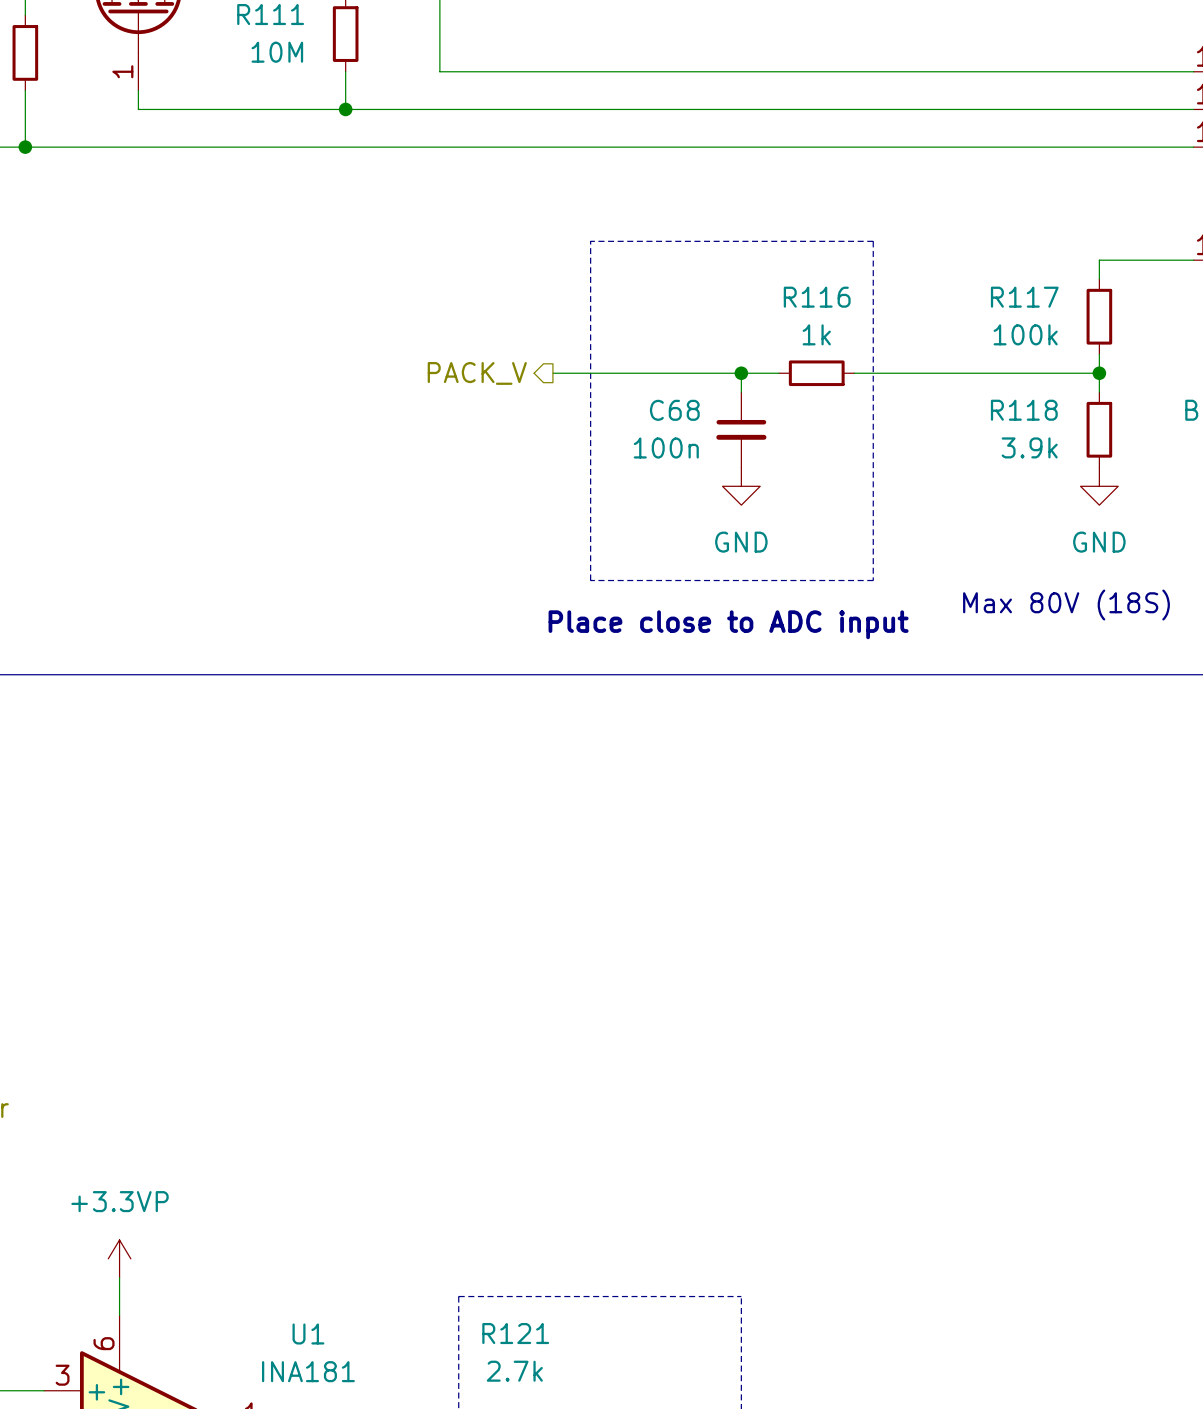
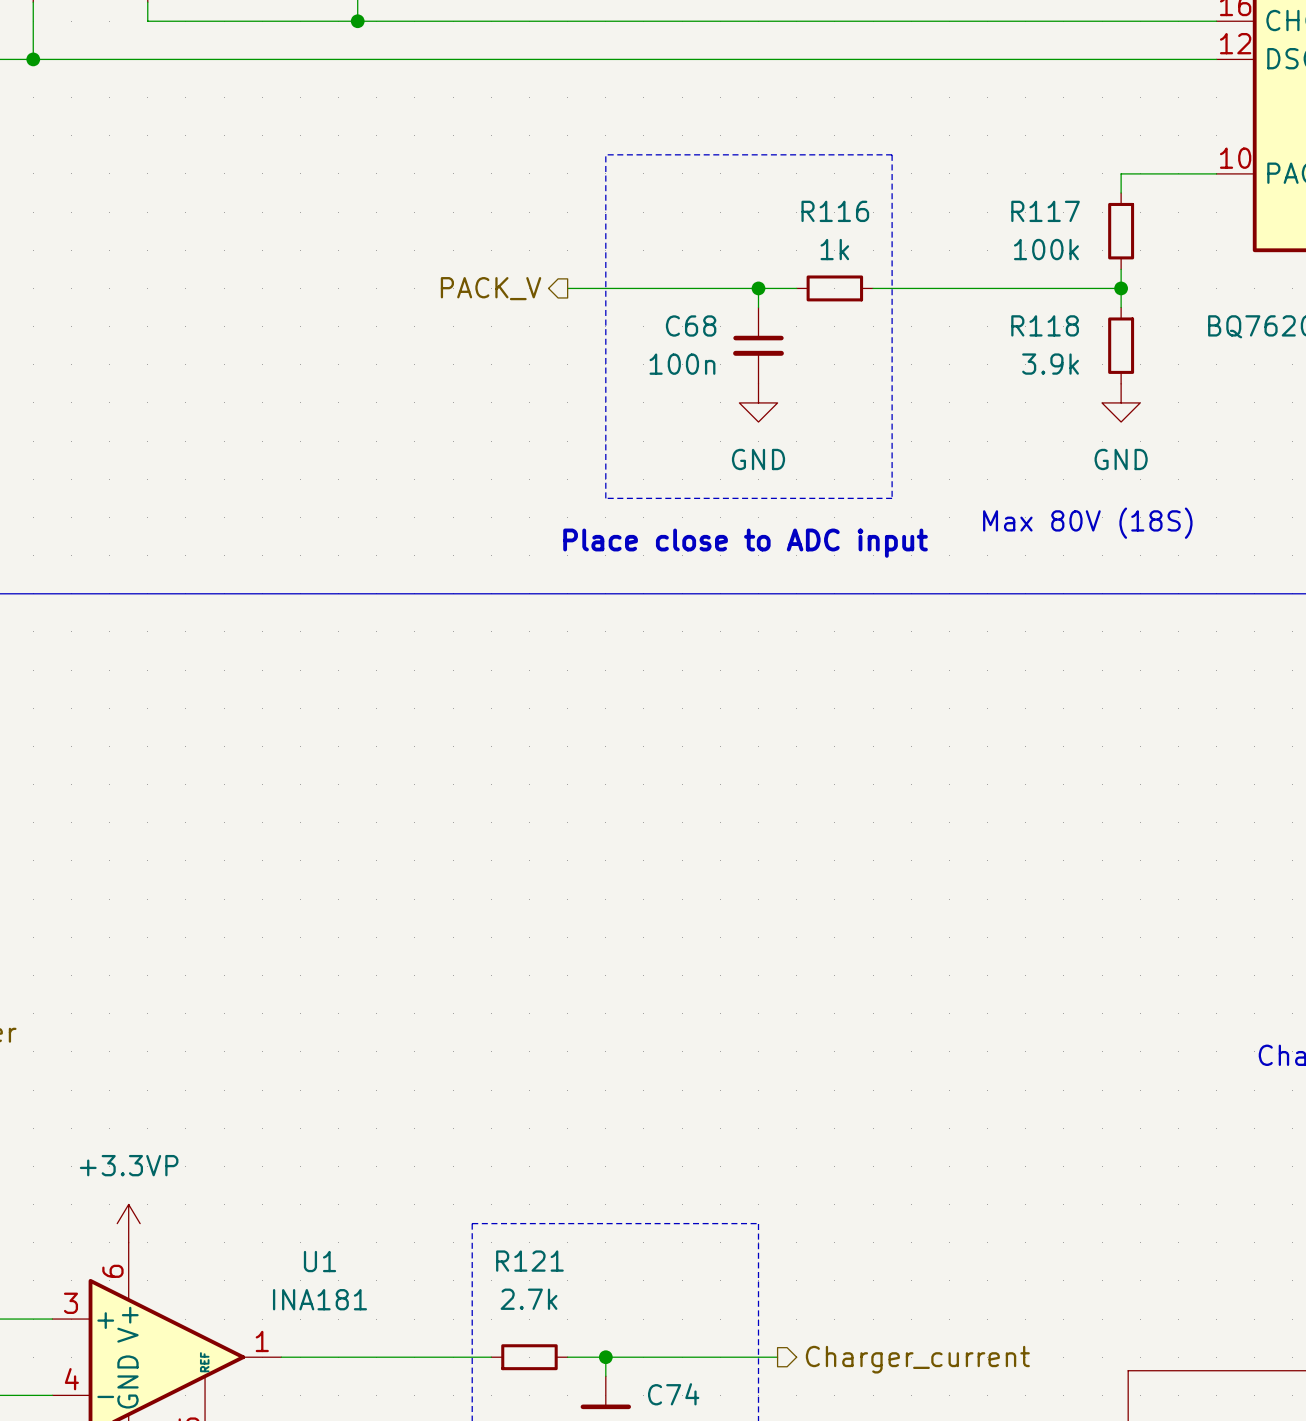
power symbol position: +3.3VP (119, 1258) -> +3.3VP (128, 1223)

